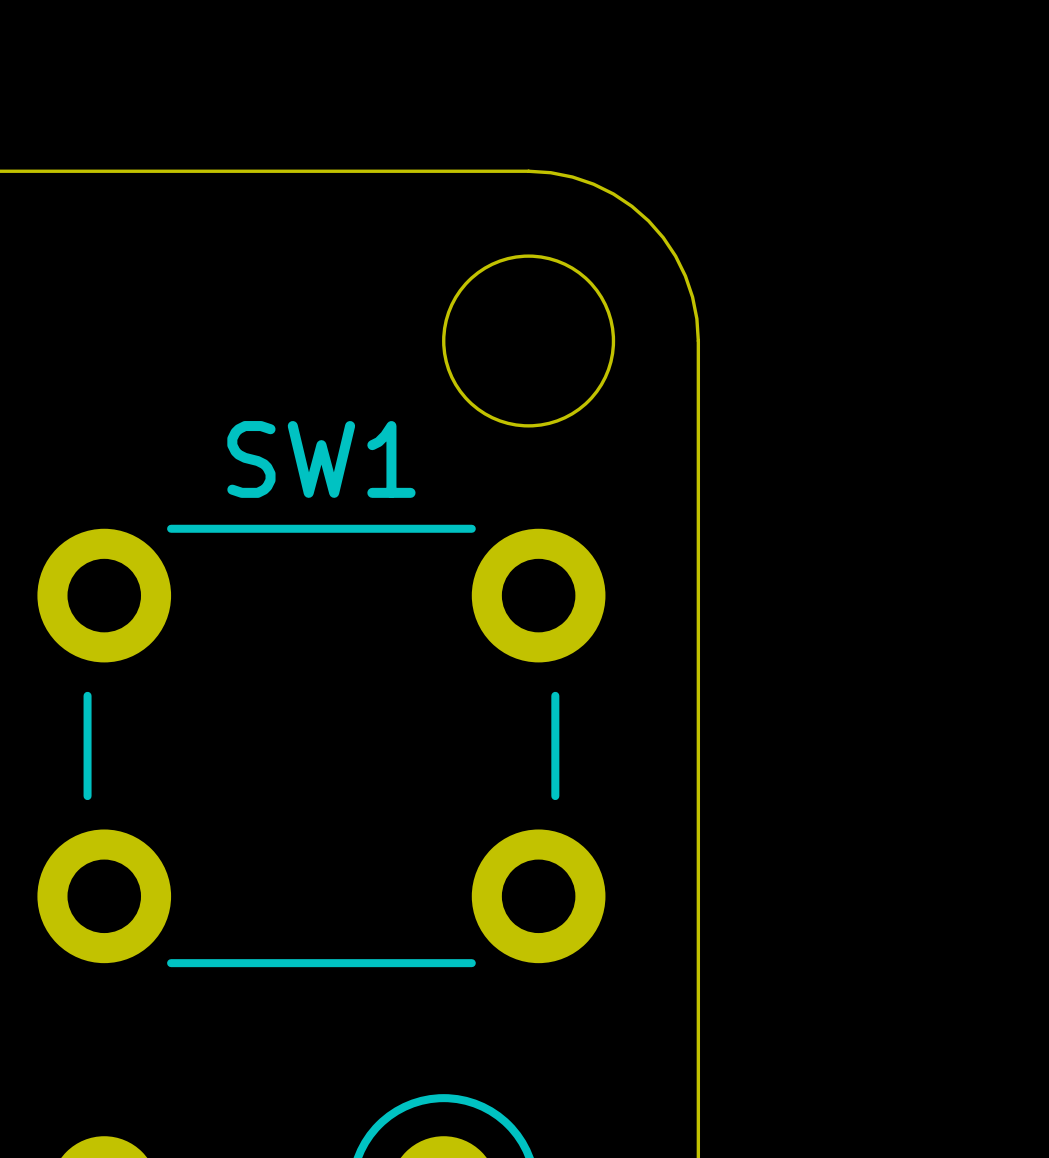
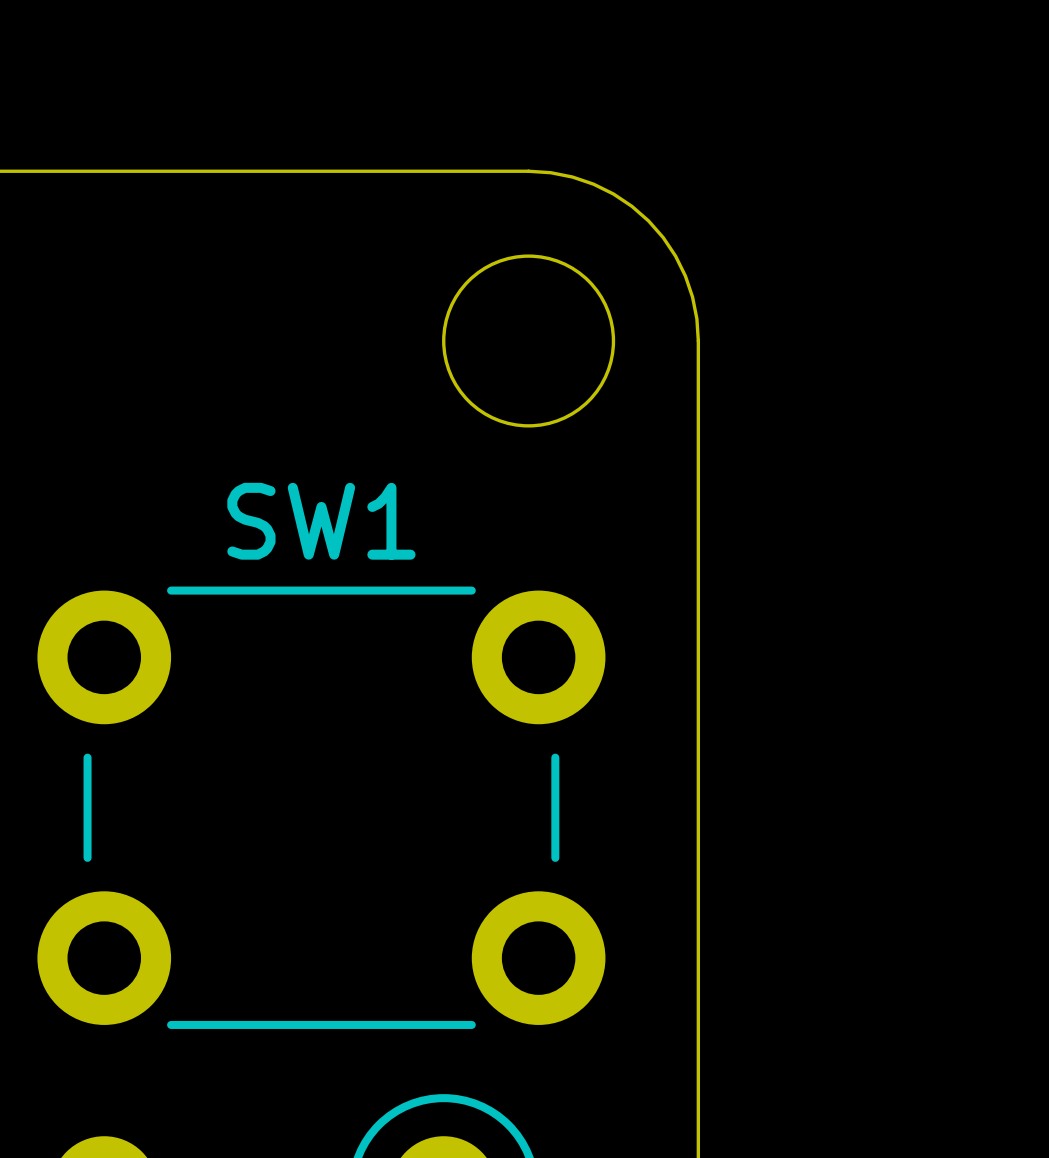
SW1 position: (321, 745) -> (321, 807)

